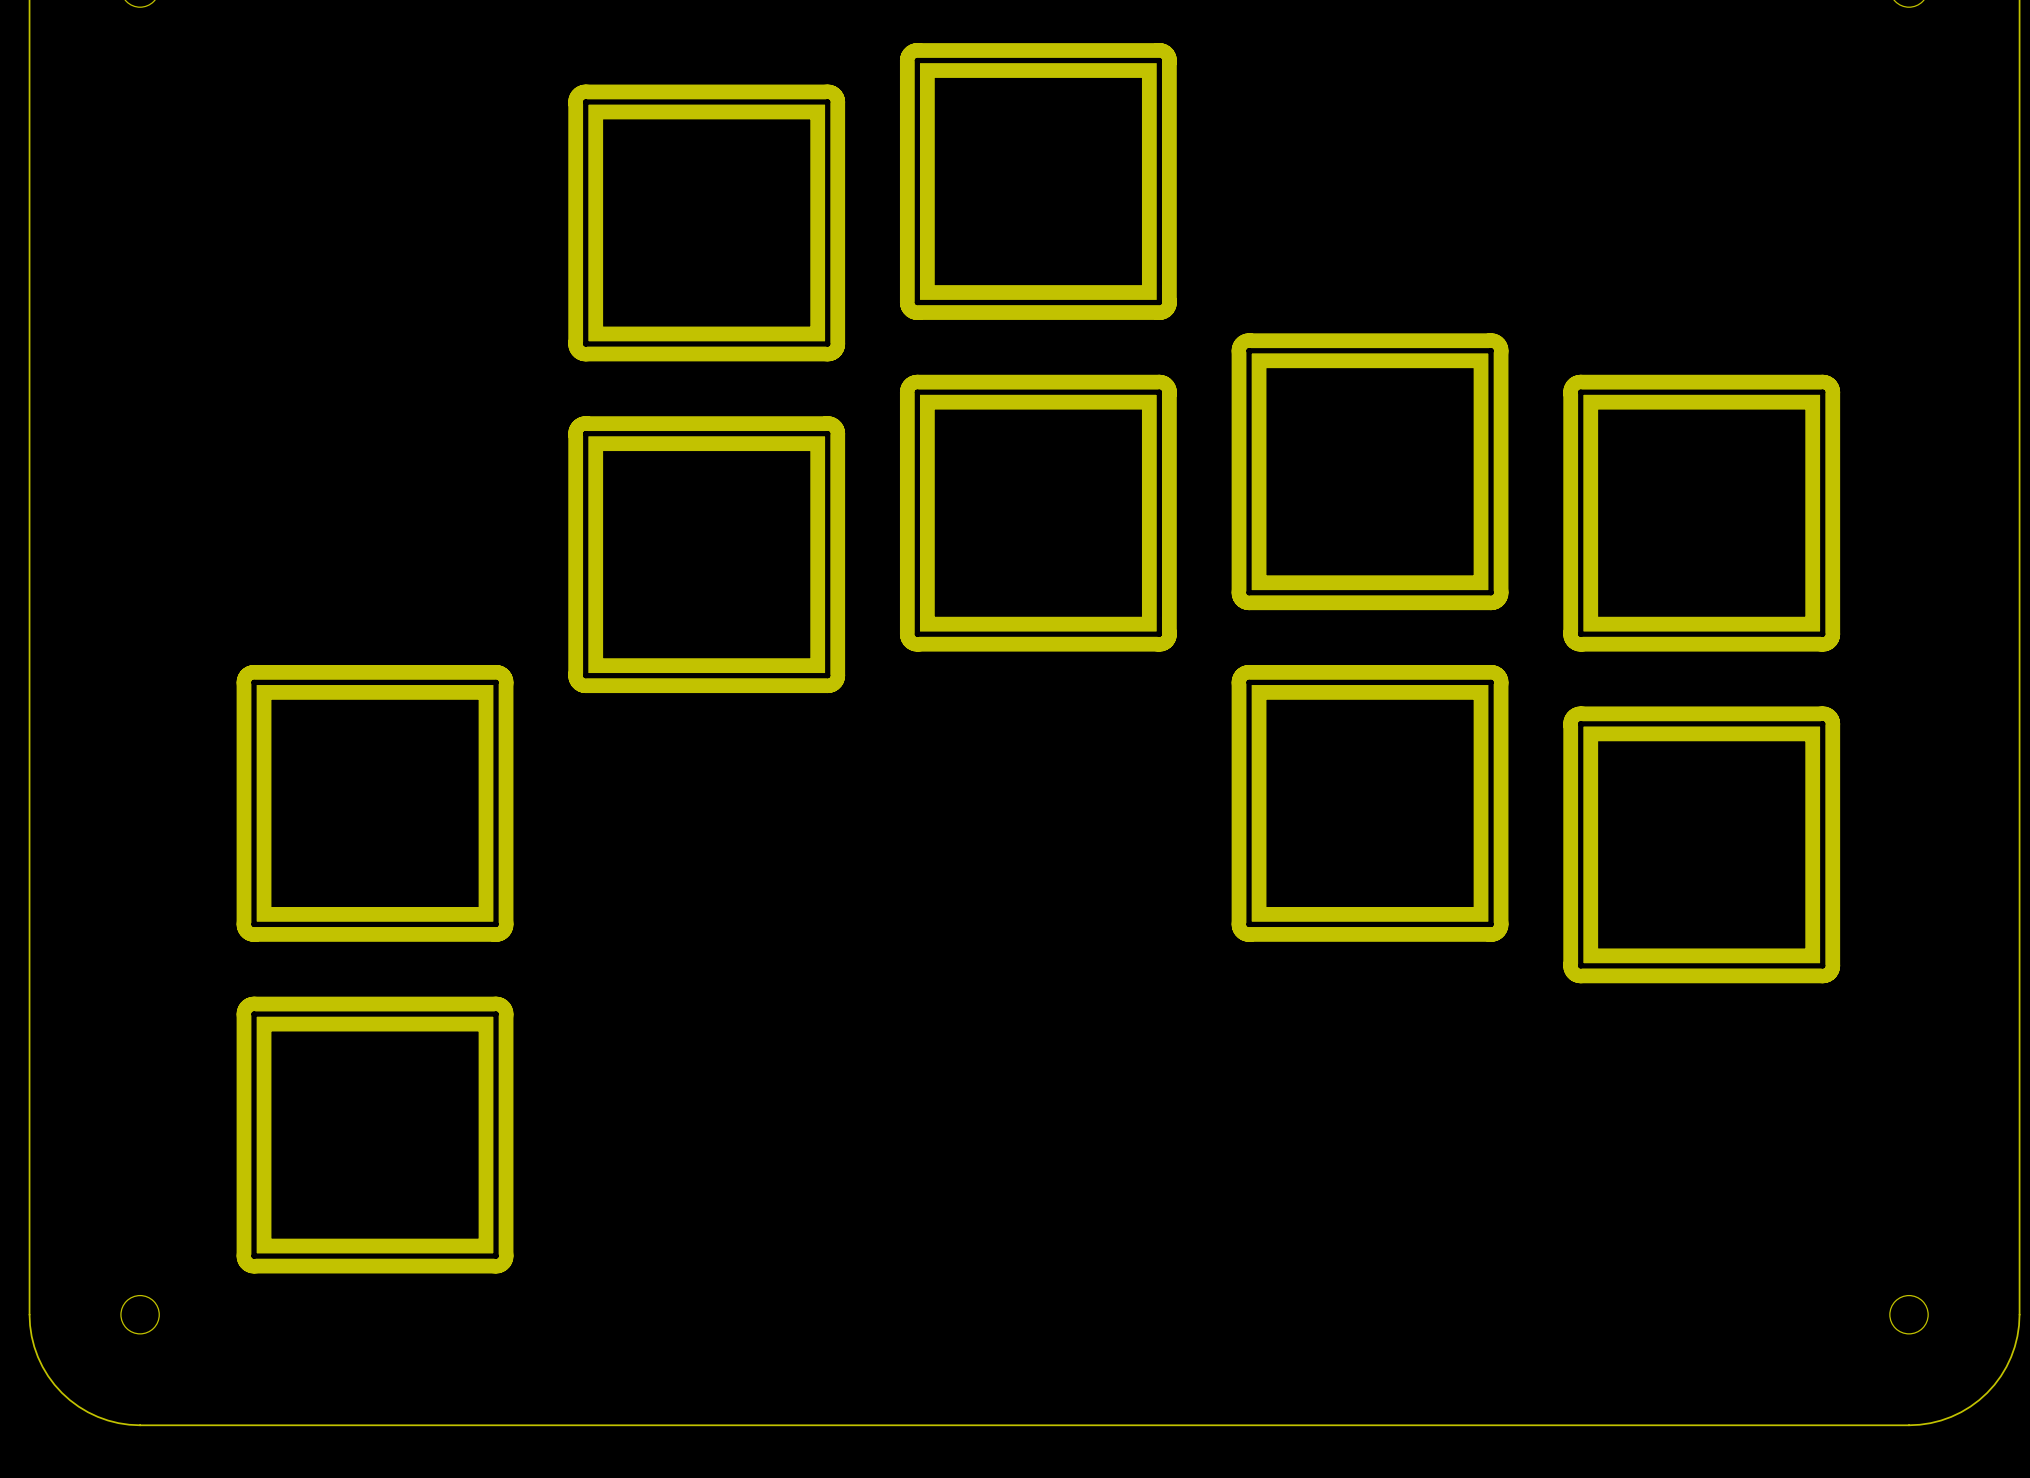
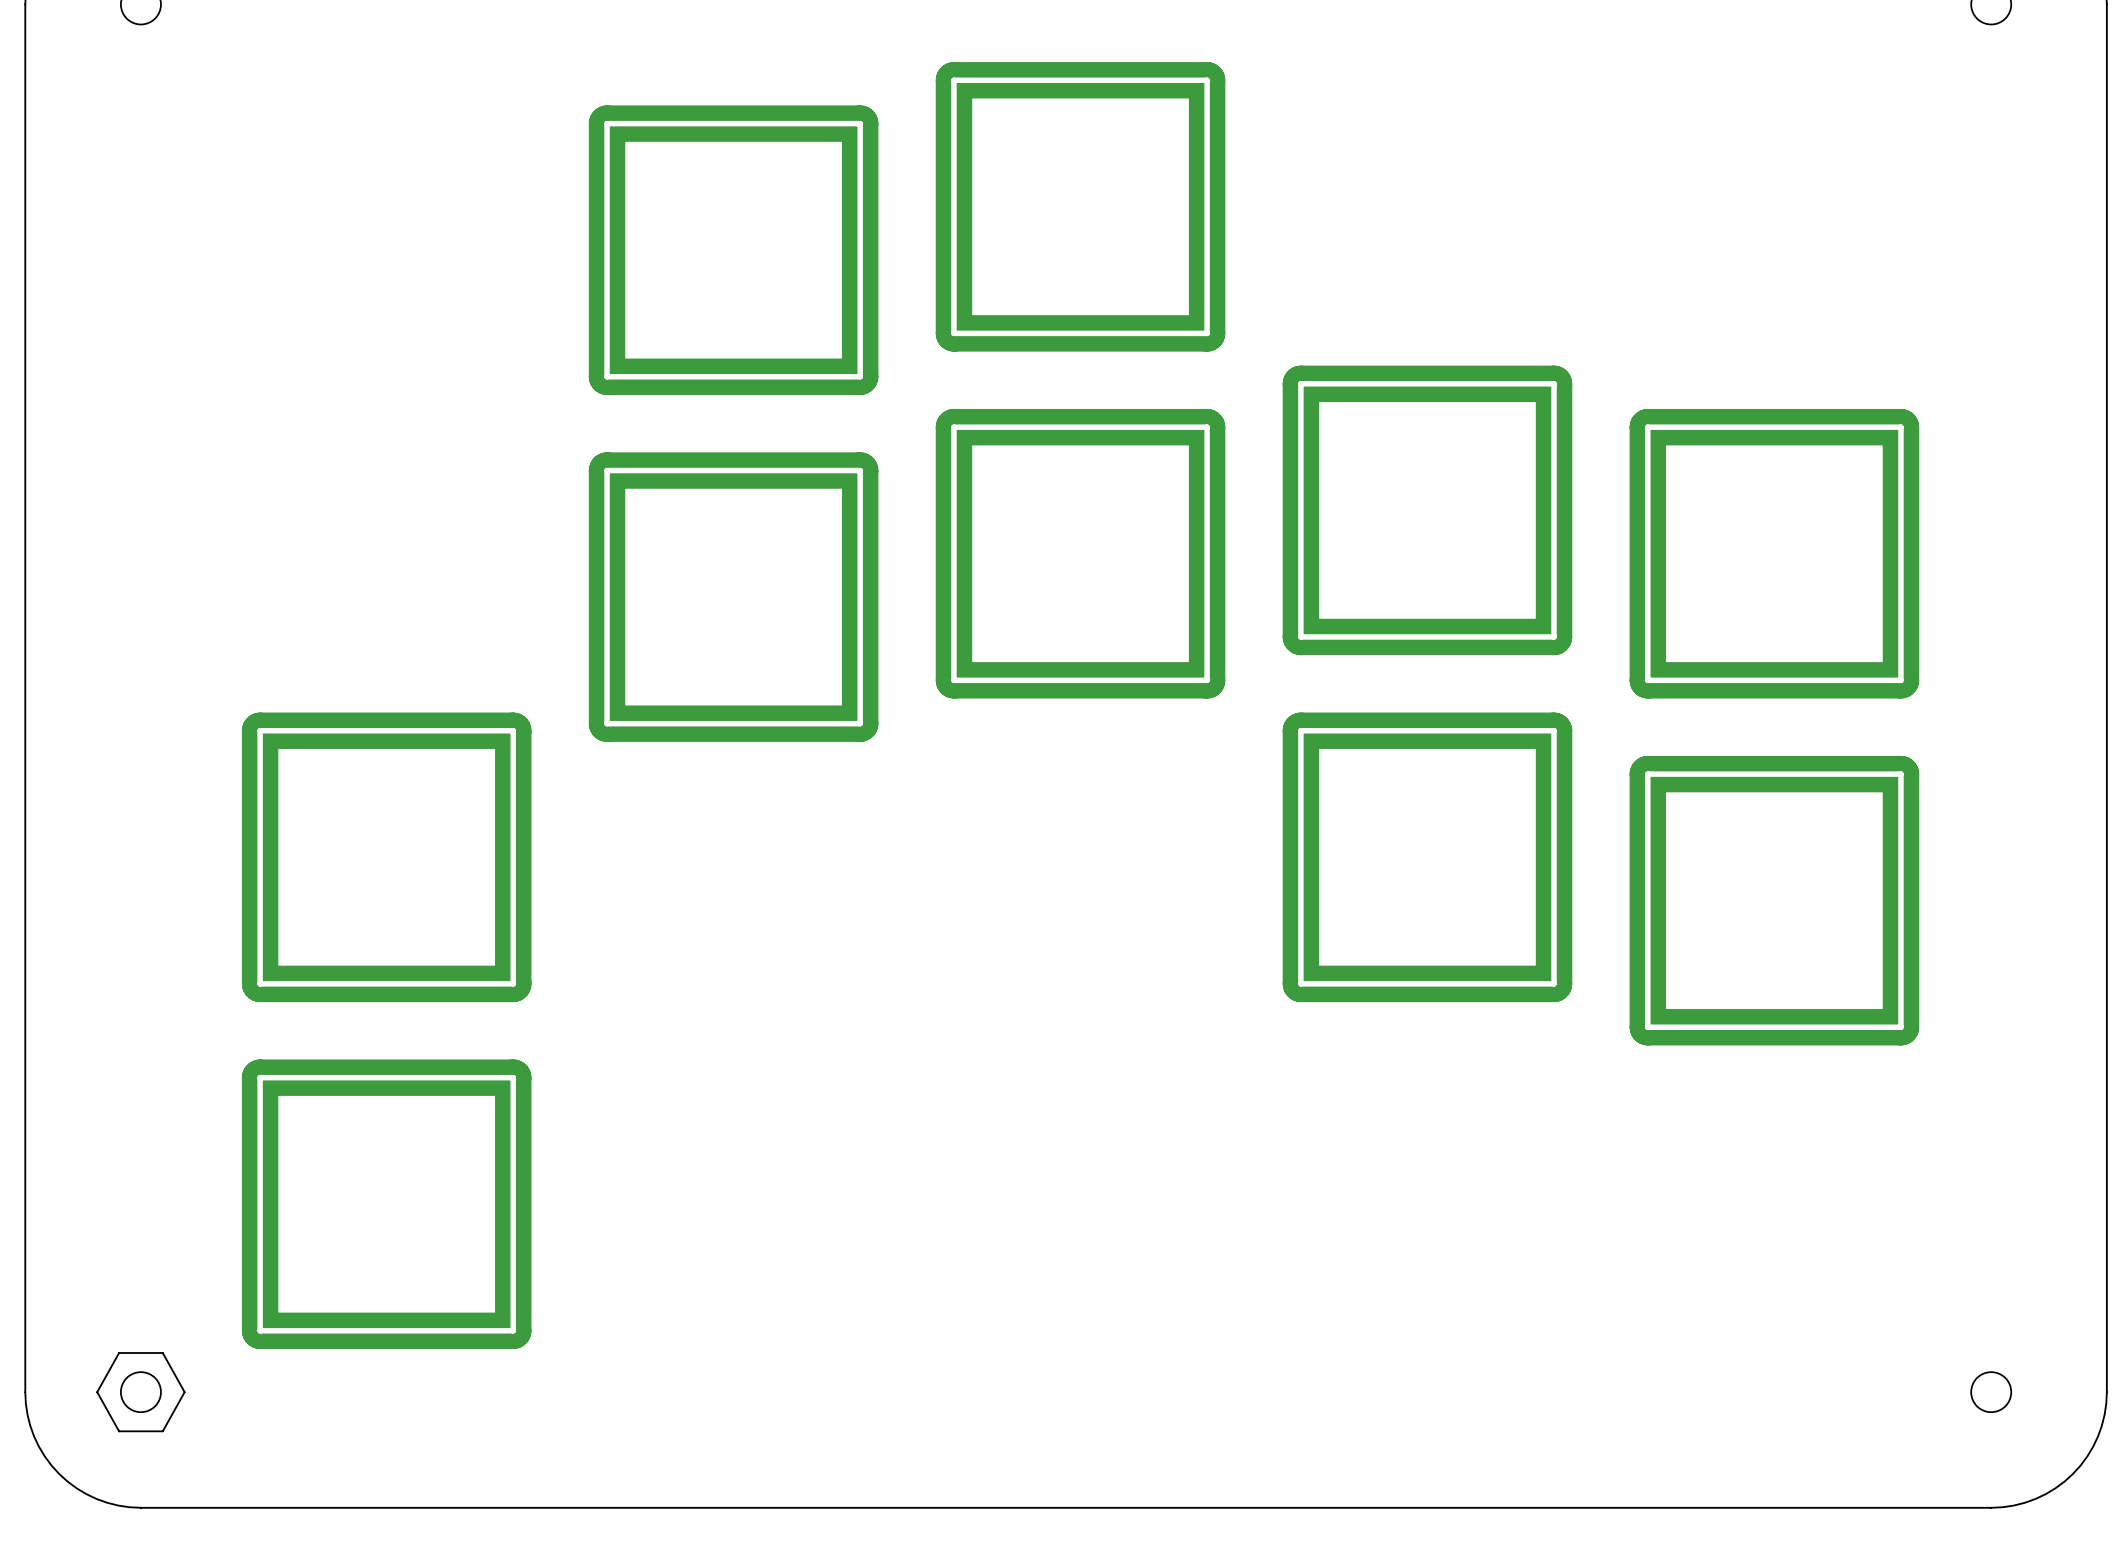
drawing: none -> [96, 1352, 186, 1433]

